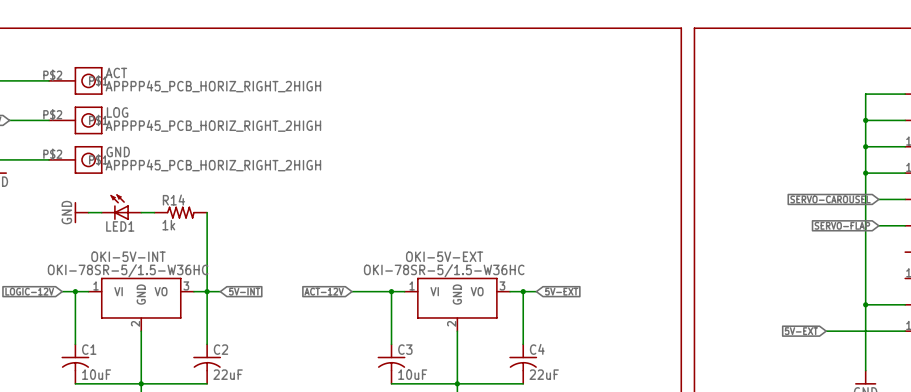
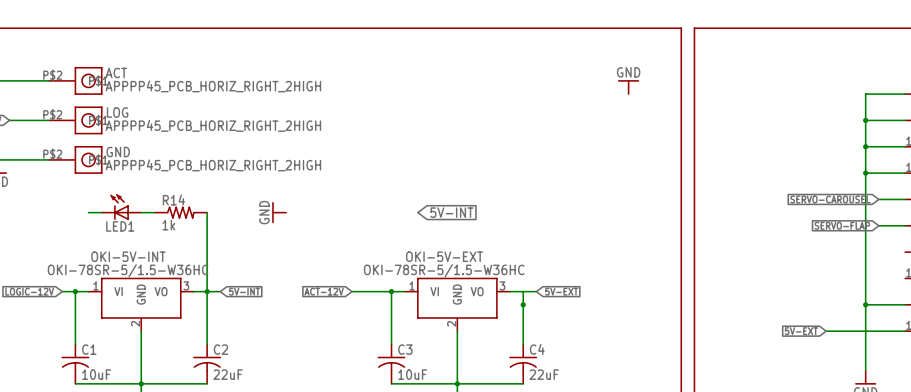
power symbol: none -> GND (628, 87)
power symbol: GND (81, 212) -> none
power symbol: none -> GND (279, 212)
global label: none -> 5V-INT (451, 212)
junction position: (523, 291) -> (523, 304)

